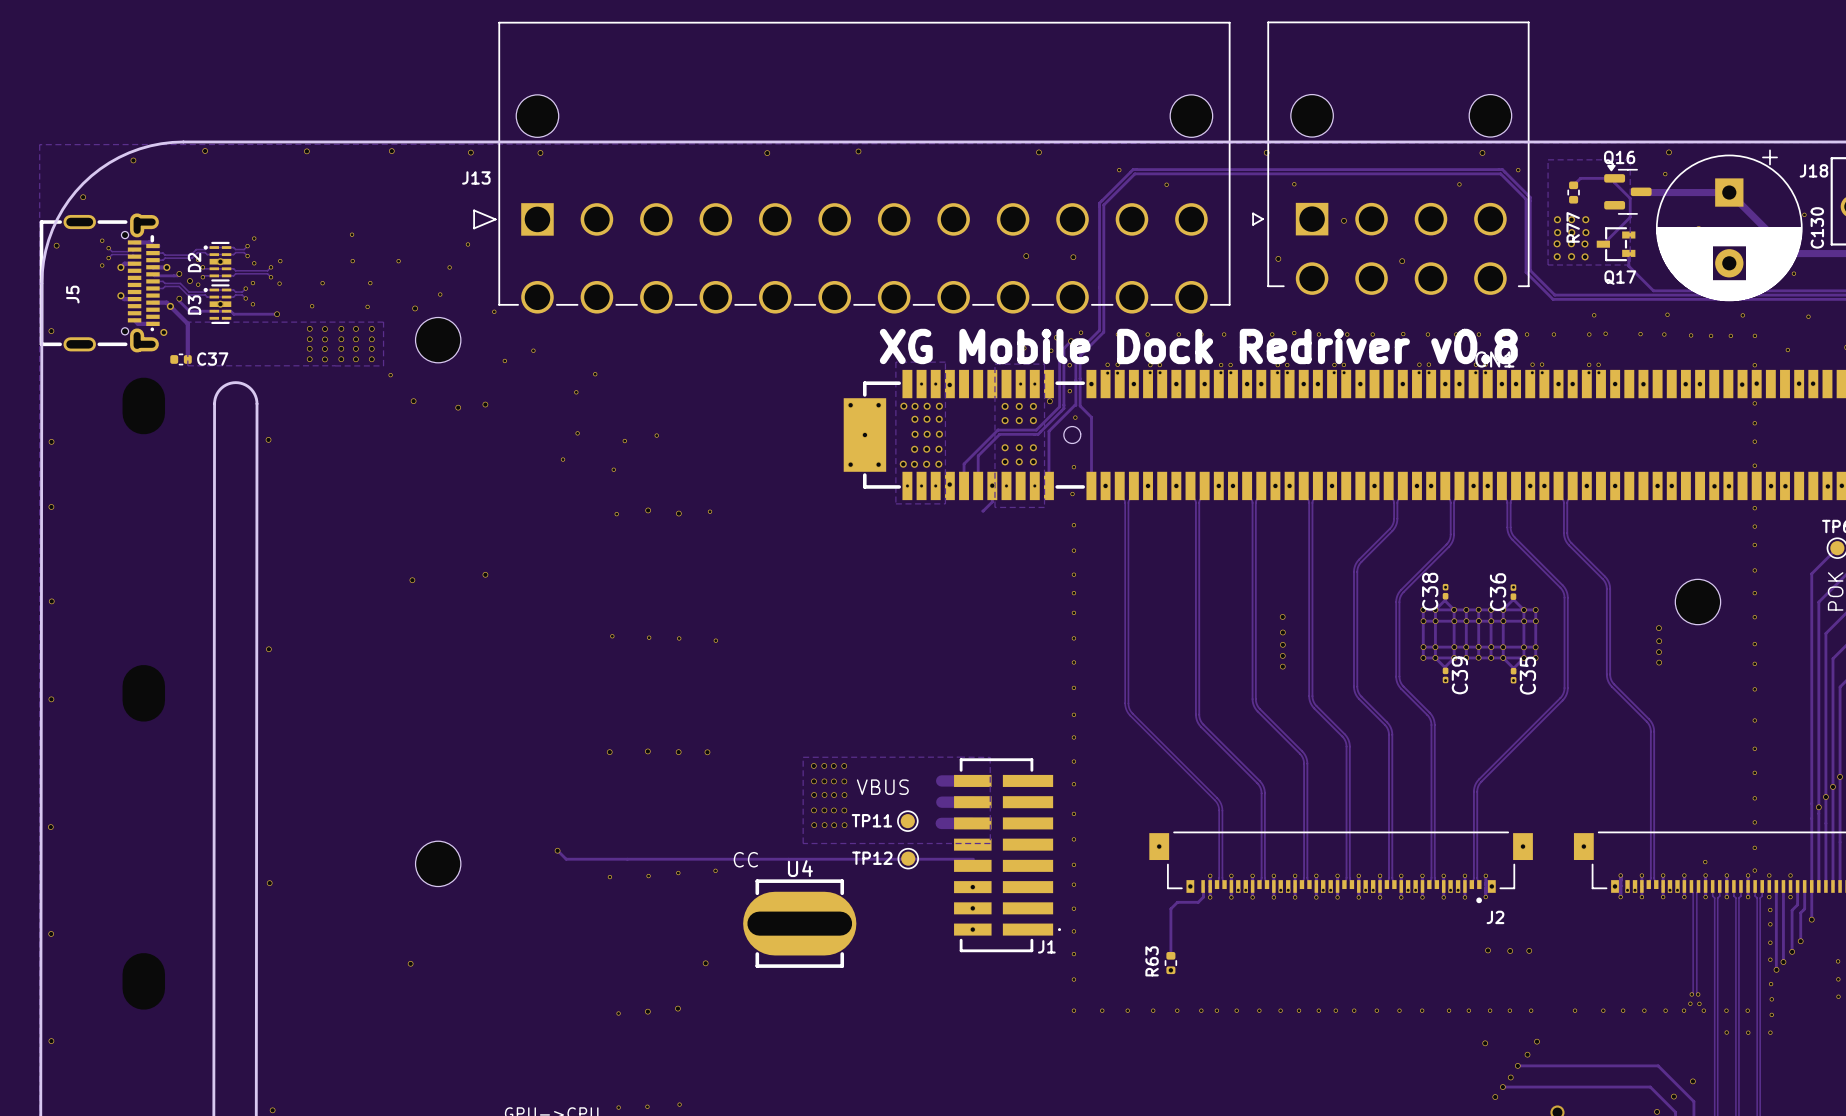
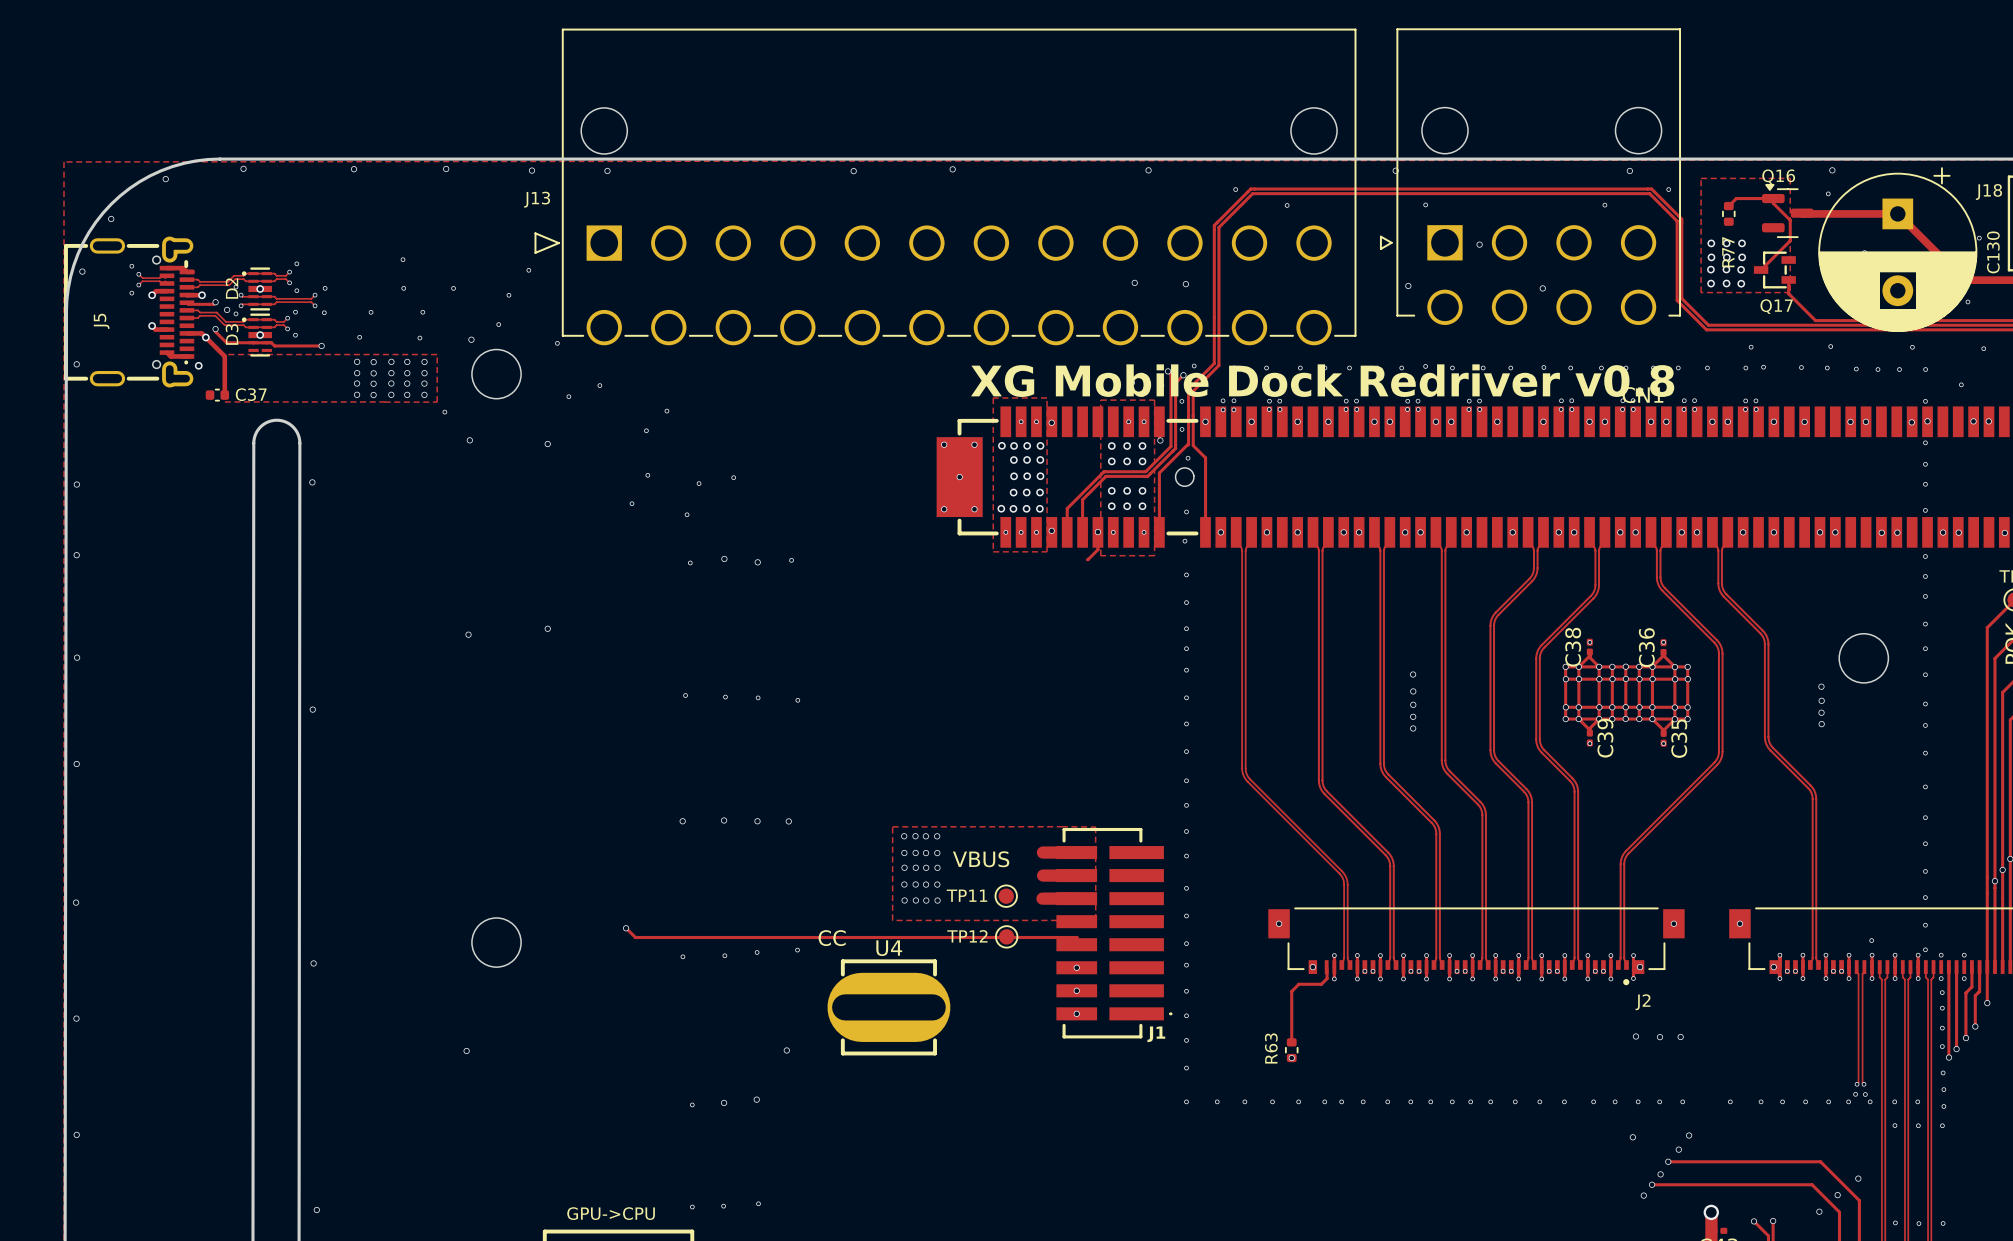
via: (458, 407) -> none

